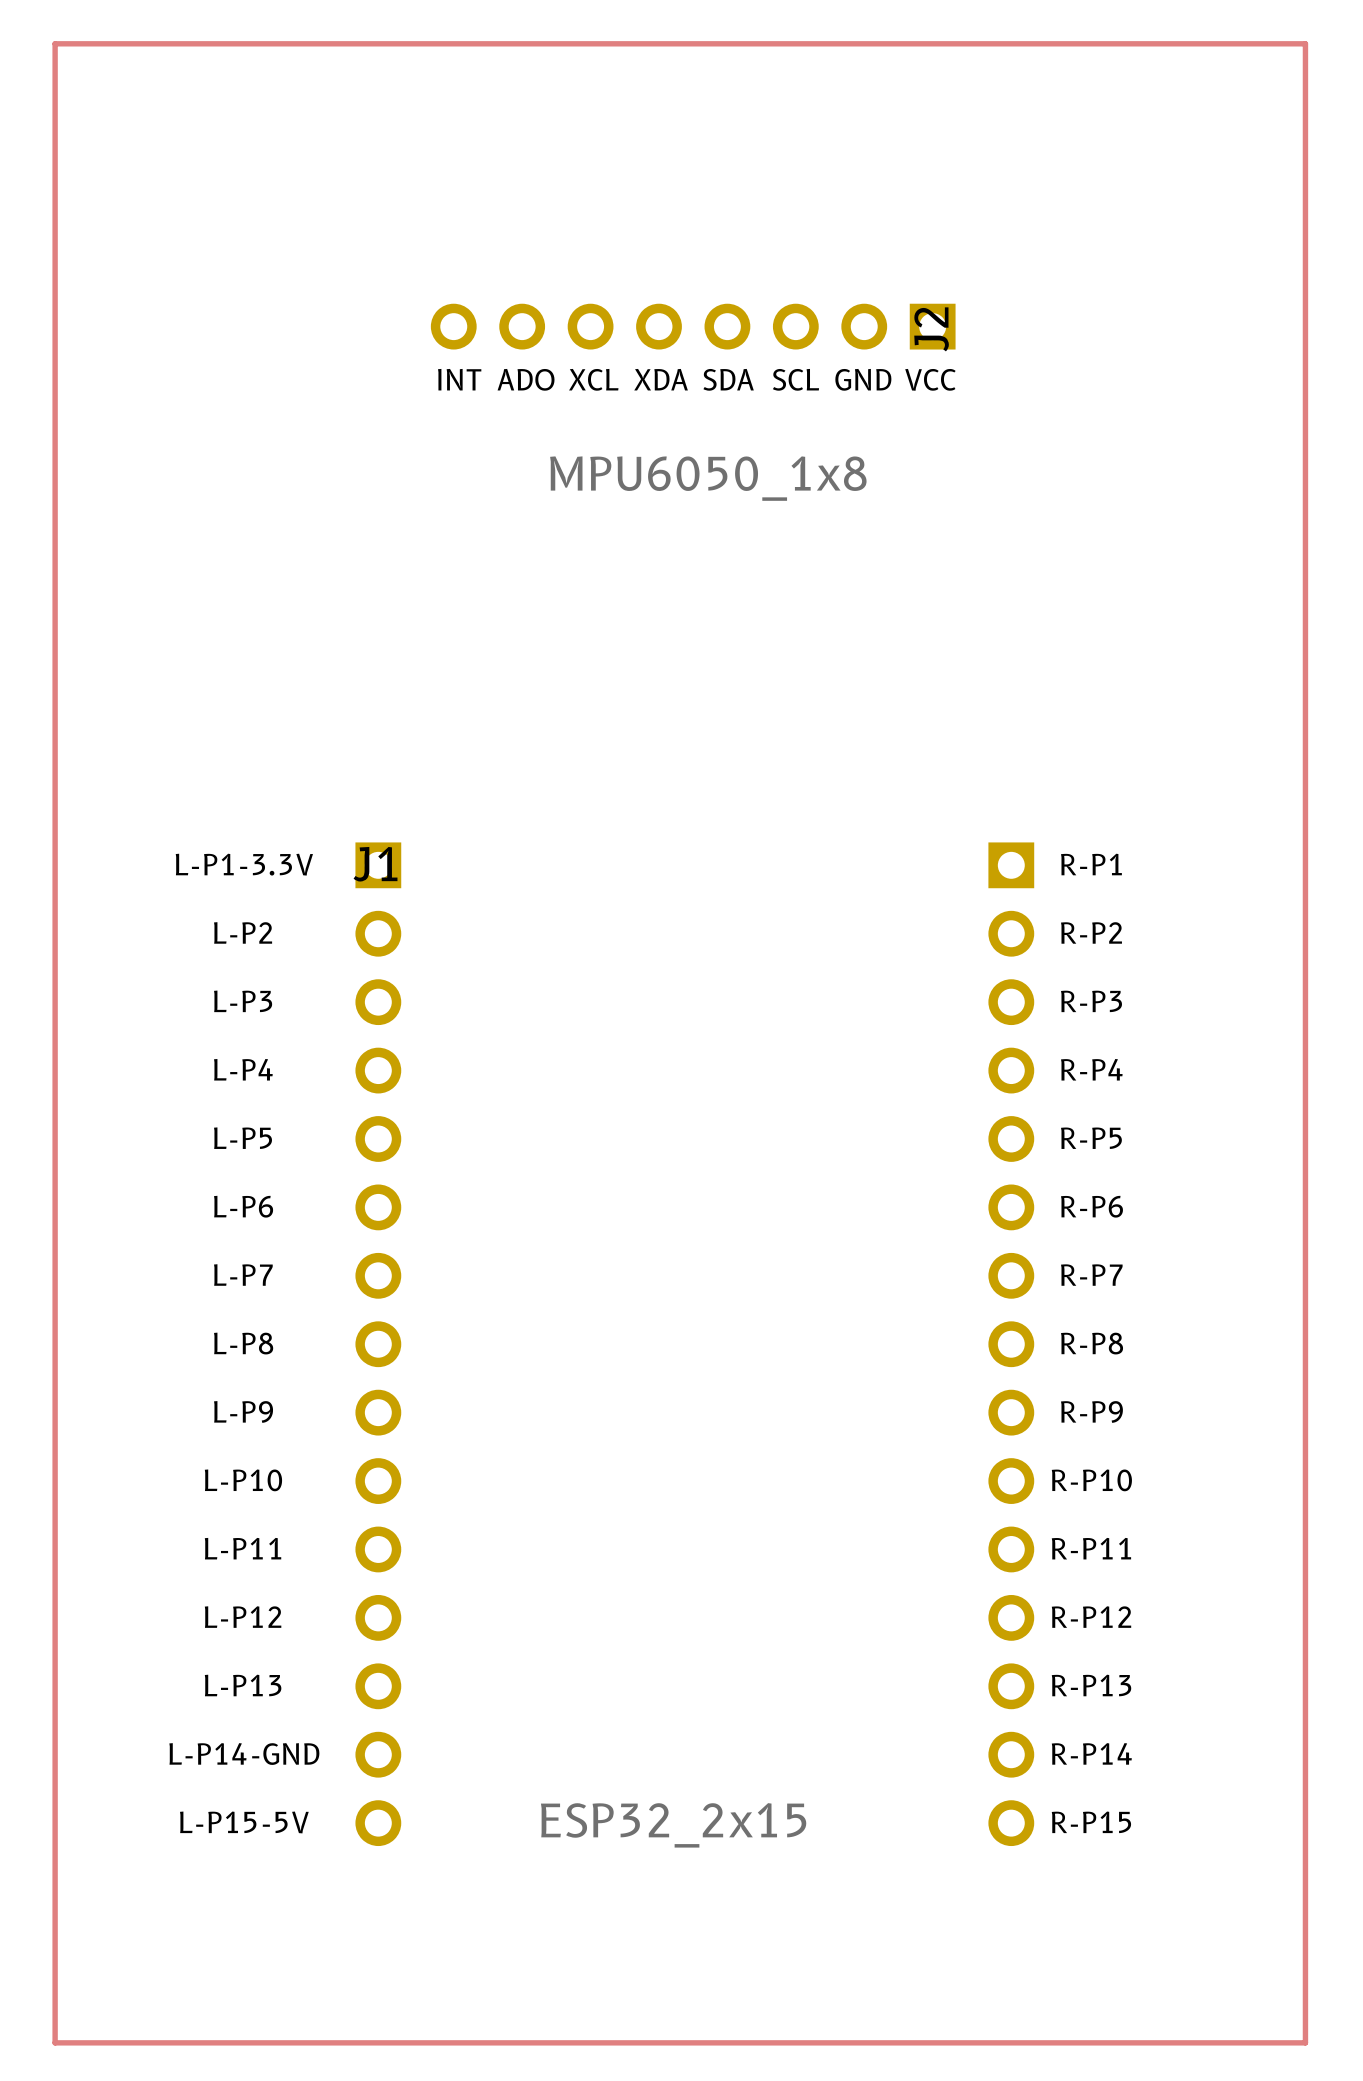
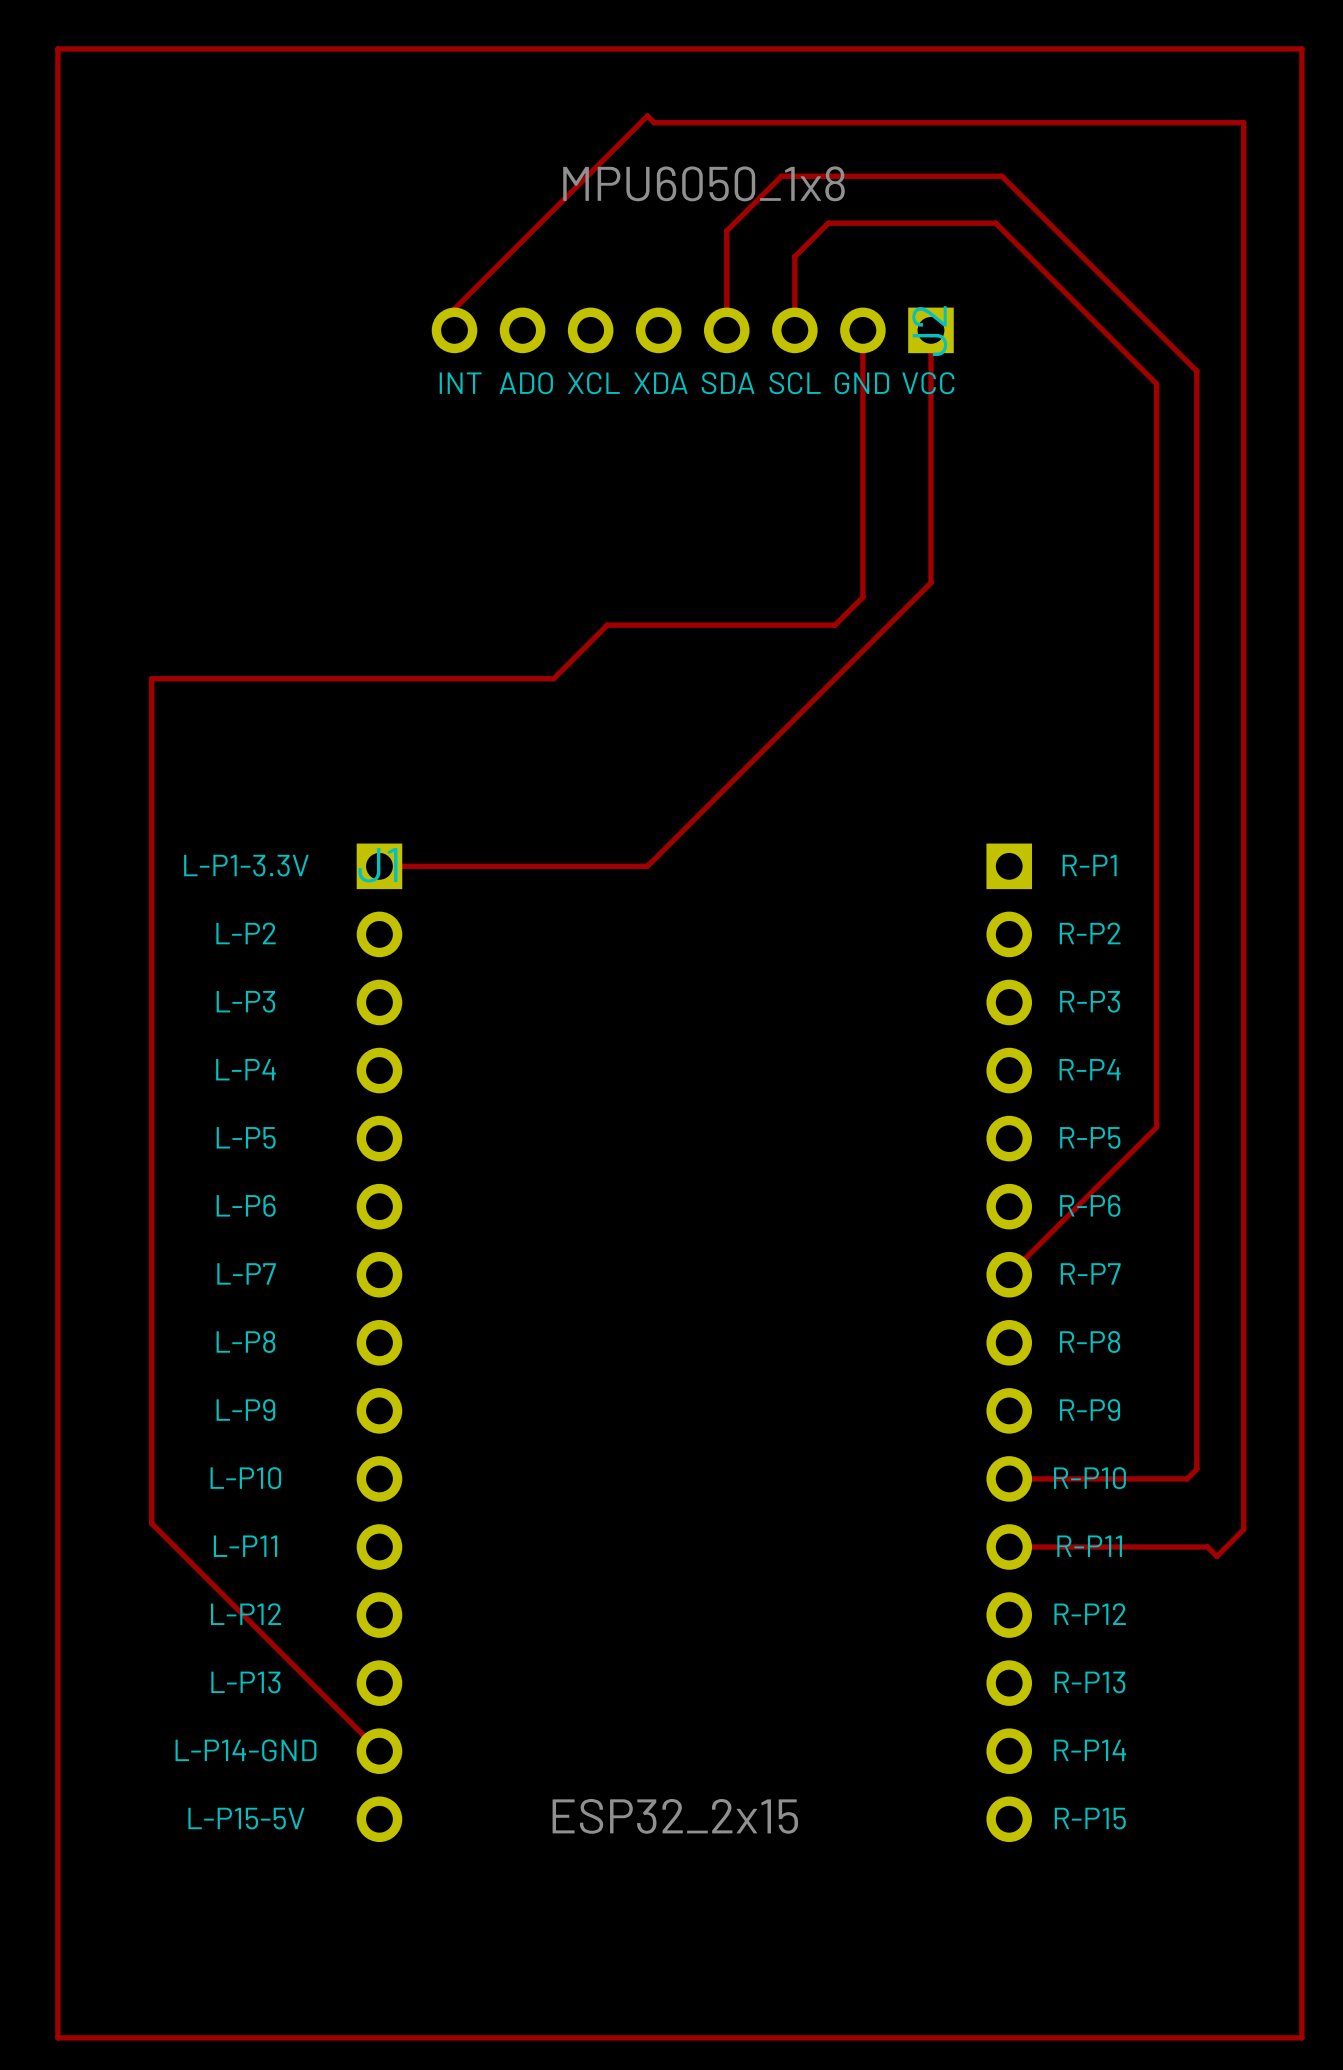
track: none -> (454, 330) (454, 308) (647, 115) (654, 122) (1243, 122) (1243, 1529) (1216, 1556) (1207, 1546) (1009, 1546)
track: none -> (726, 330) (726, 230) (781, 176) (1001, 176) (1196, 371) (1196, 1469) (1187, 1478) (1009, 1478)
track: none -> (794, 330) (794, 256) (828, 223) (995, 223) (1156, 383) (1156, 1127) (1009, 1274)
track: none -> (862, 330) (862, 597) (835, 625) (607, 625) (553, 678) (151, 678) (151, 1523) (379, 1751)
track: none -> (930, 330) (930, 582) (647, 866) (379, 866)
J2 value position: MPU6050_1x8 (708, 478) -> MPU6050_1x8 (704, 183)

